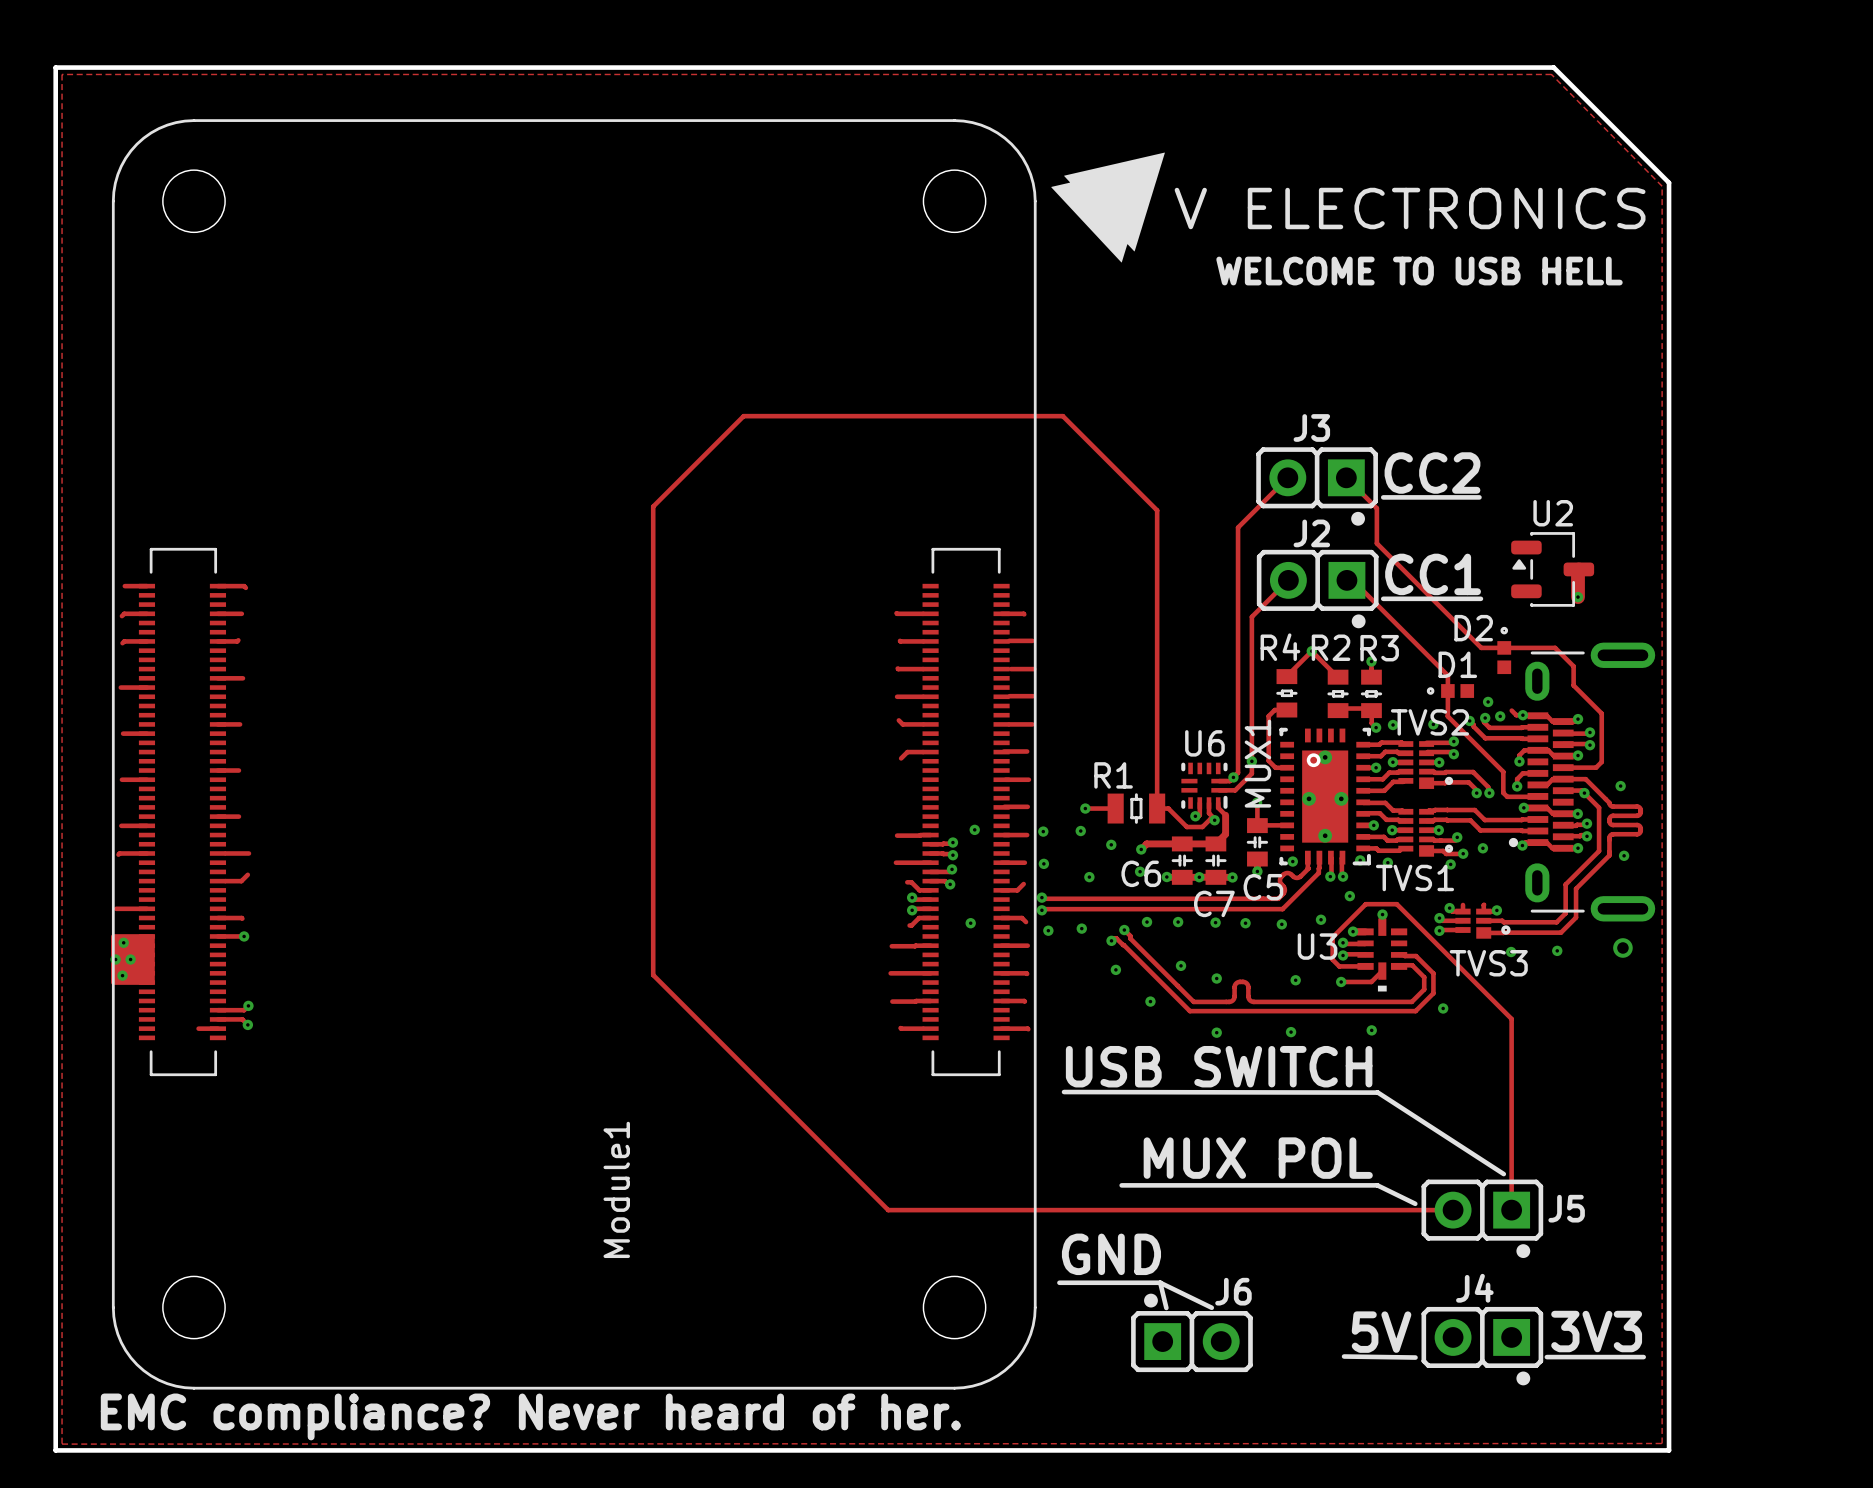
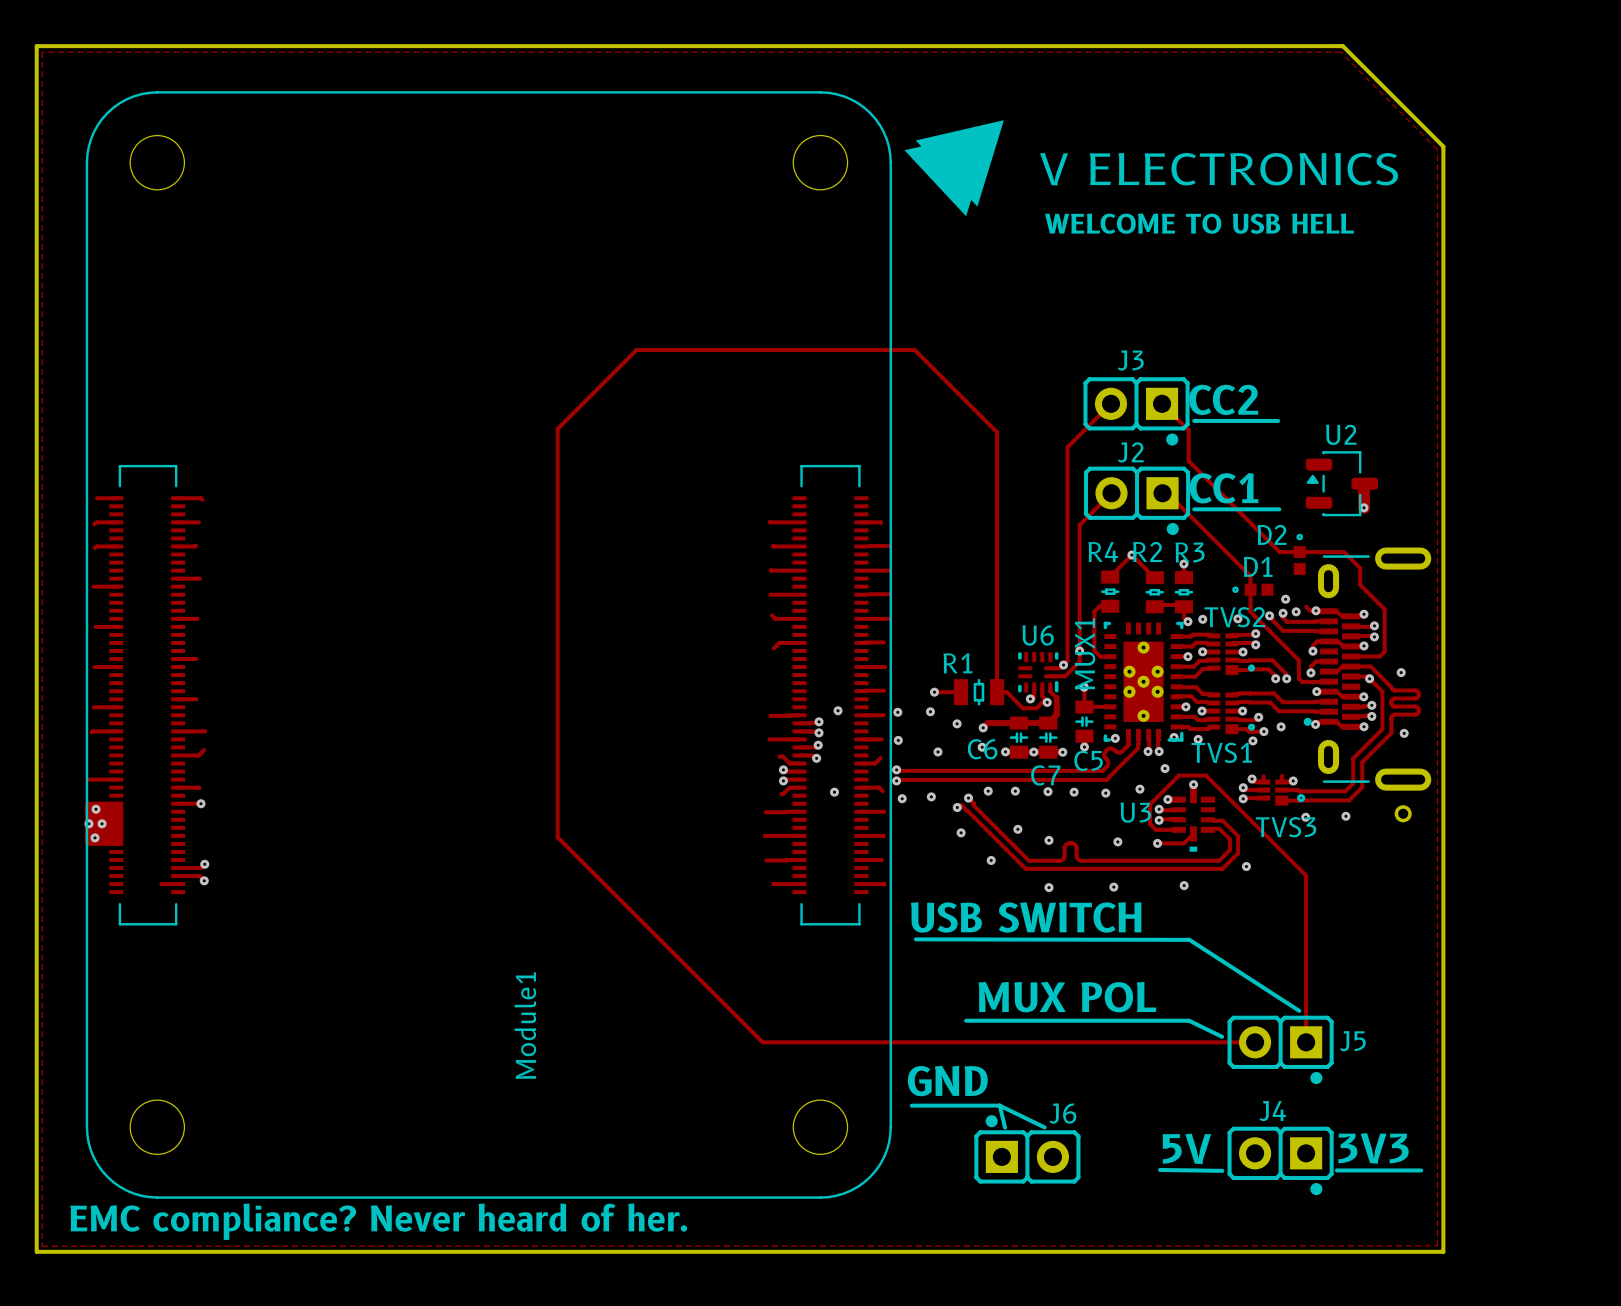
MUX1 footprint: [1279, 727, 1371, 866] -> [1103, 621, 1184, 742]

